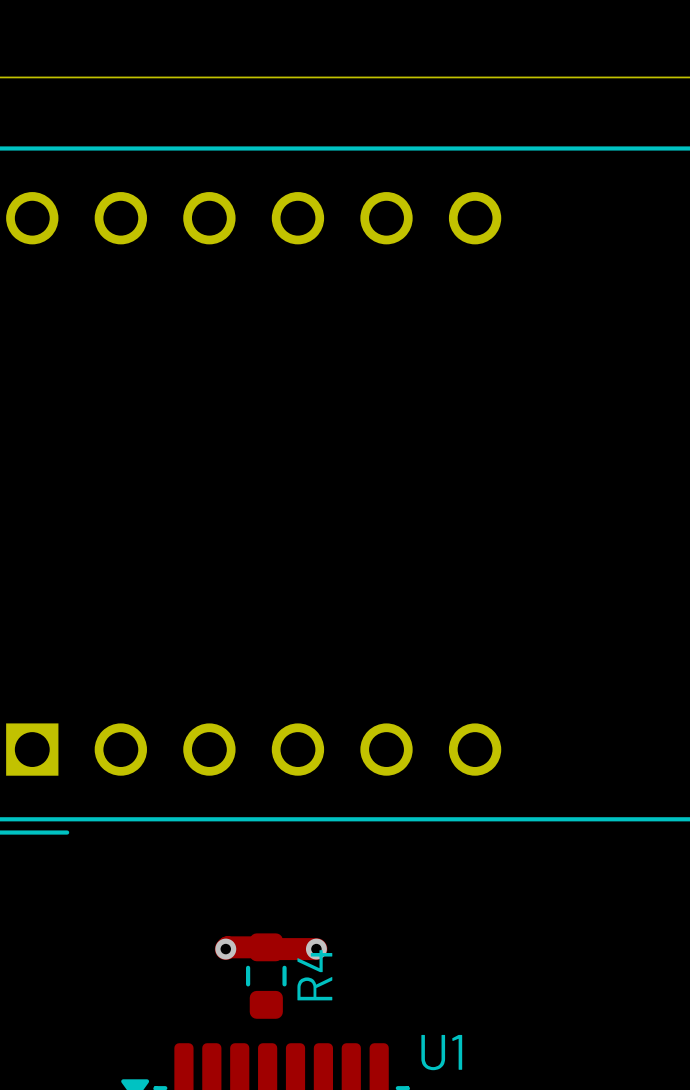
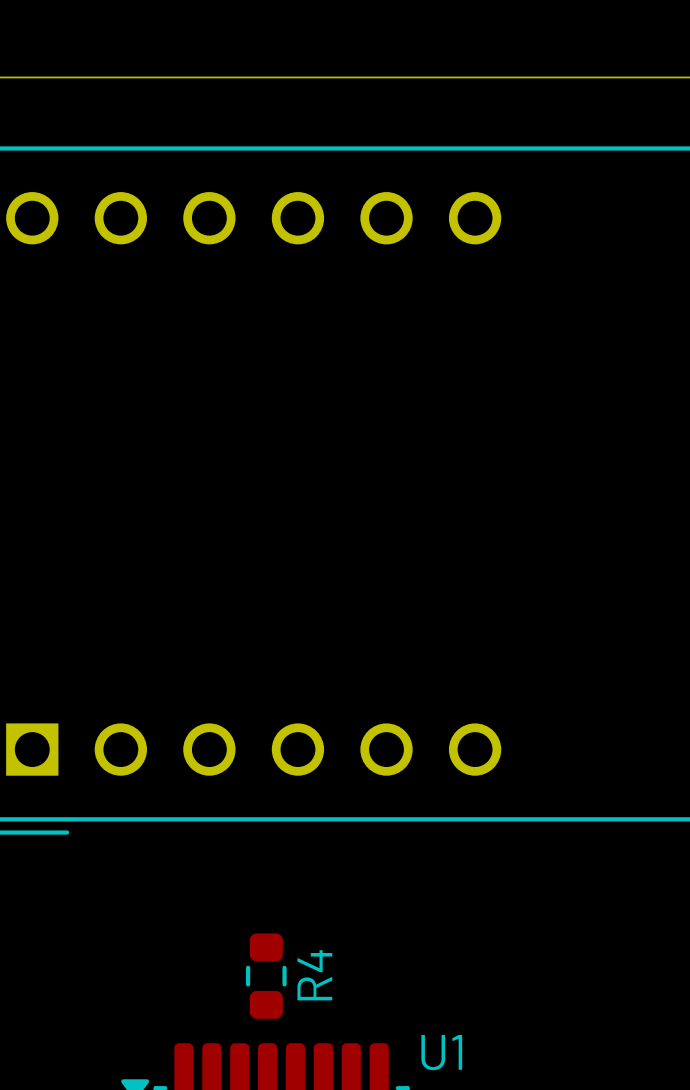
track: (225, 949) (227, 947) (316, 949) -> none
via: (225, 949) -> none
via: (316, 949) -> none

